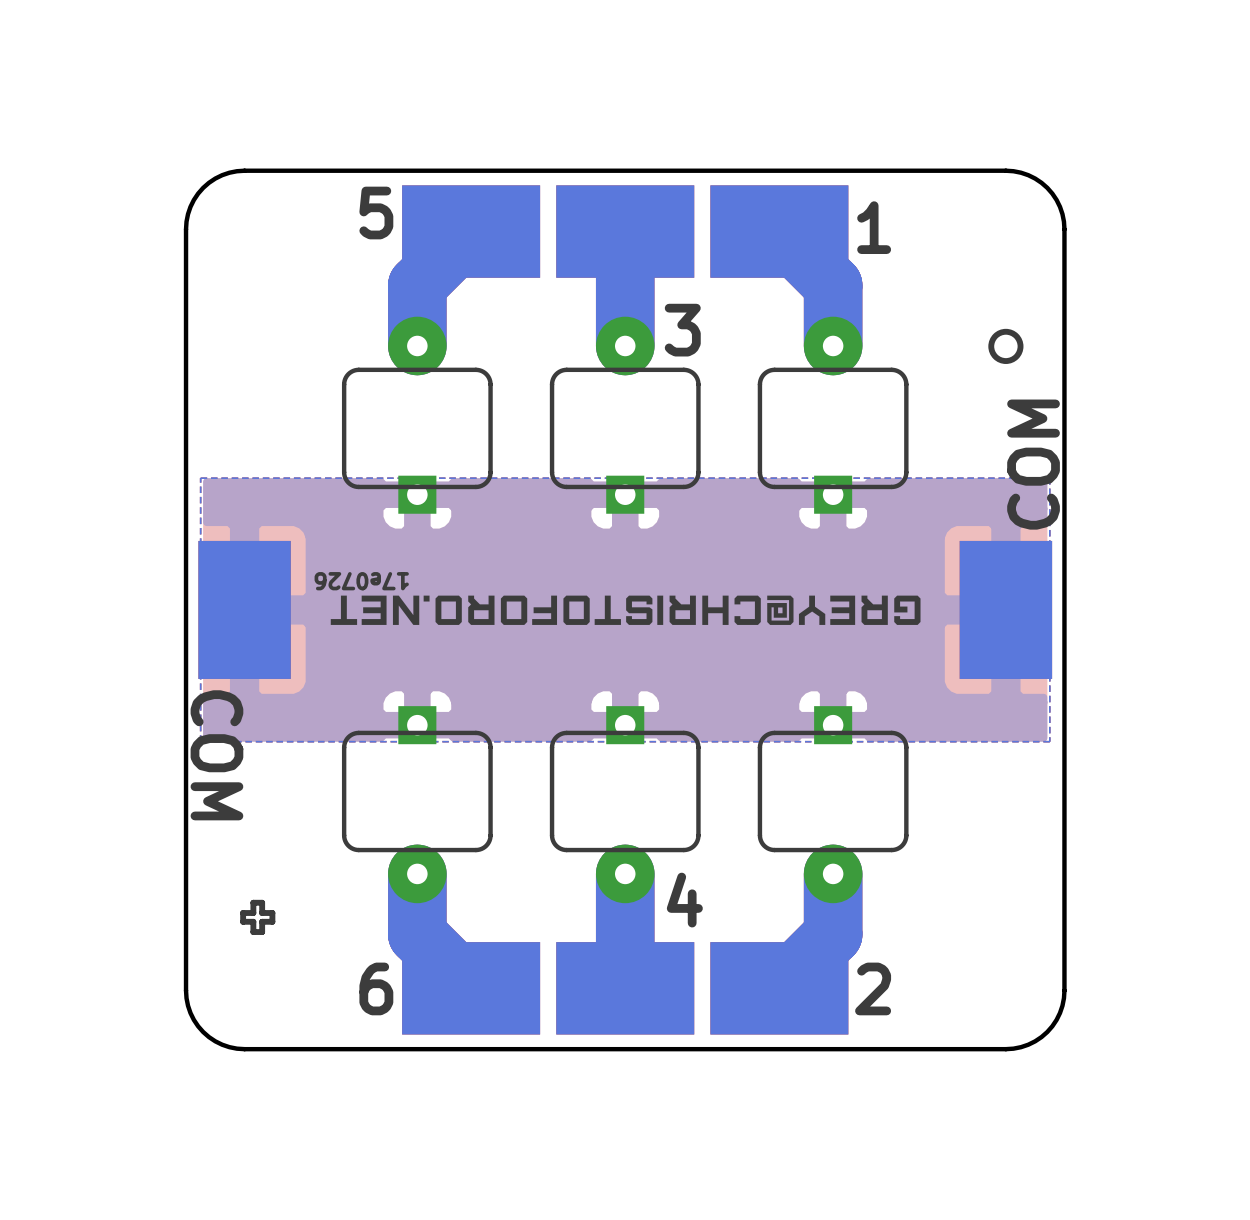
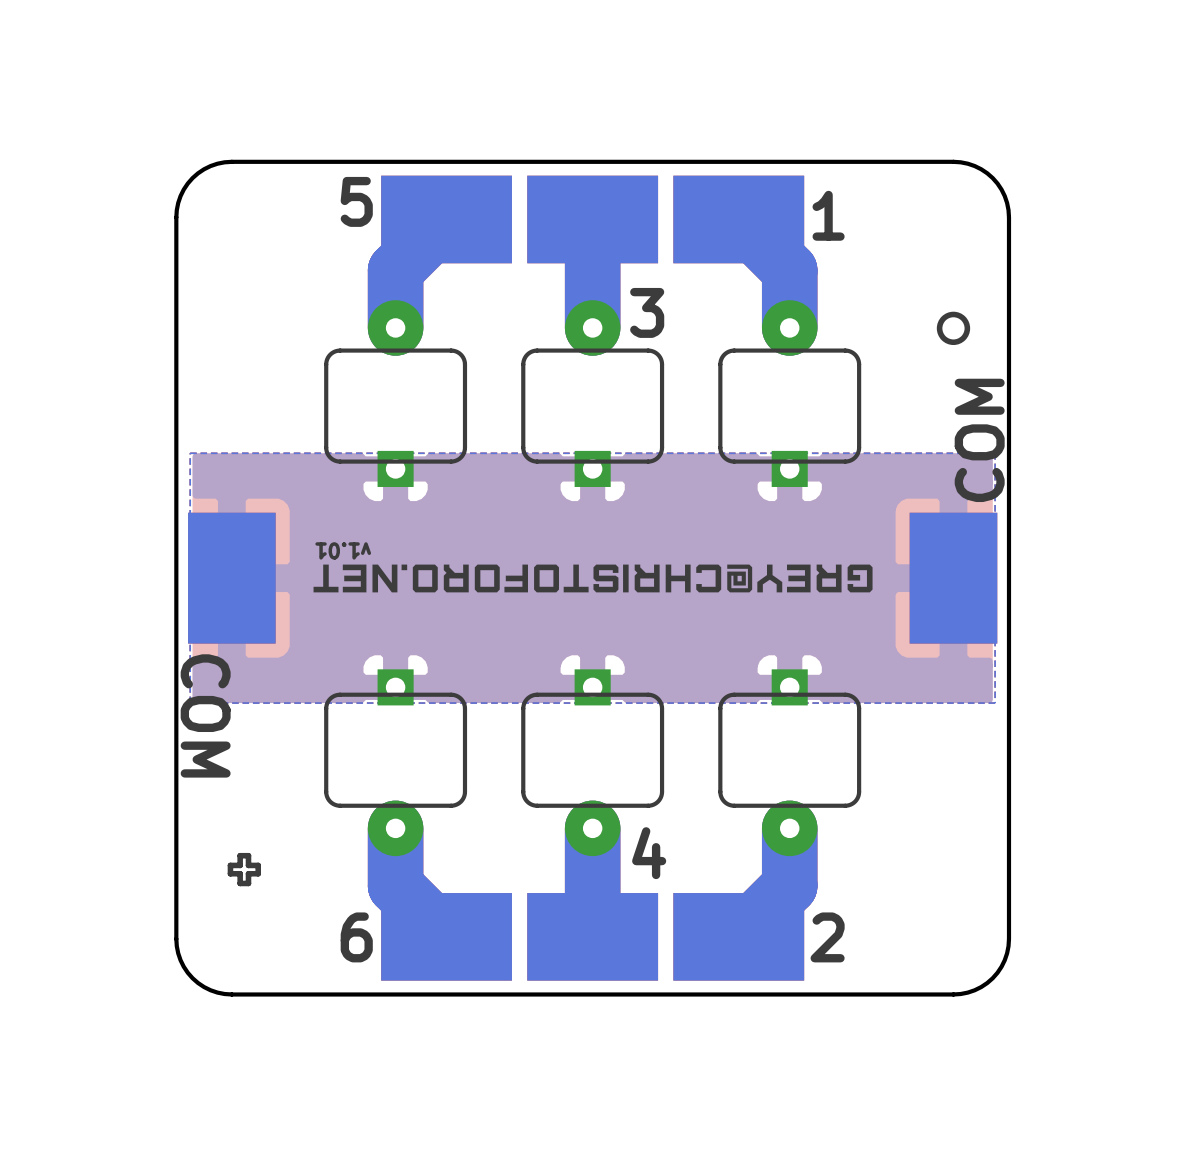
text: 17e0726 (361, 581) -> v1.01 (343, 550)

